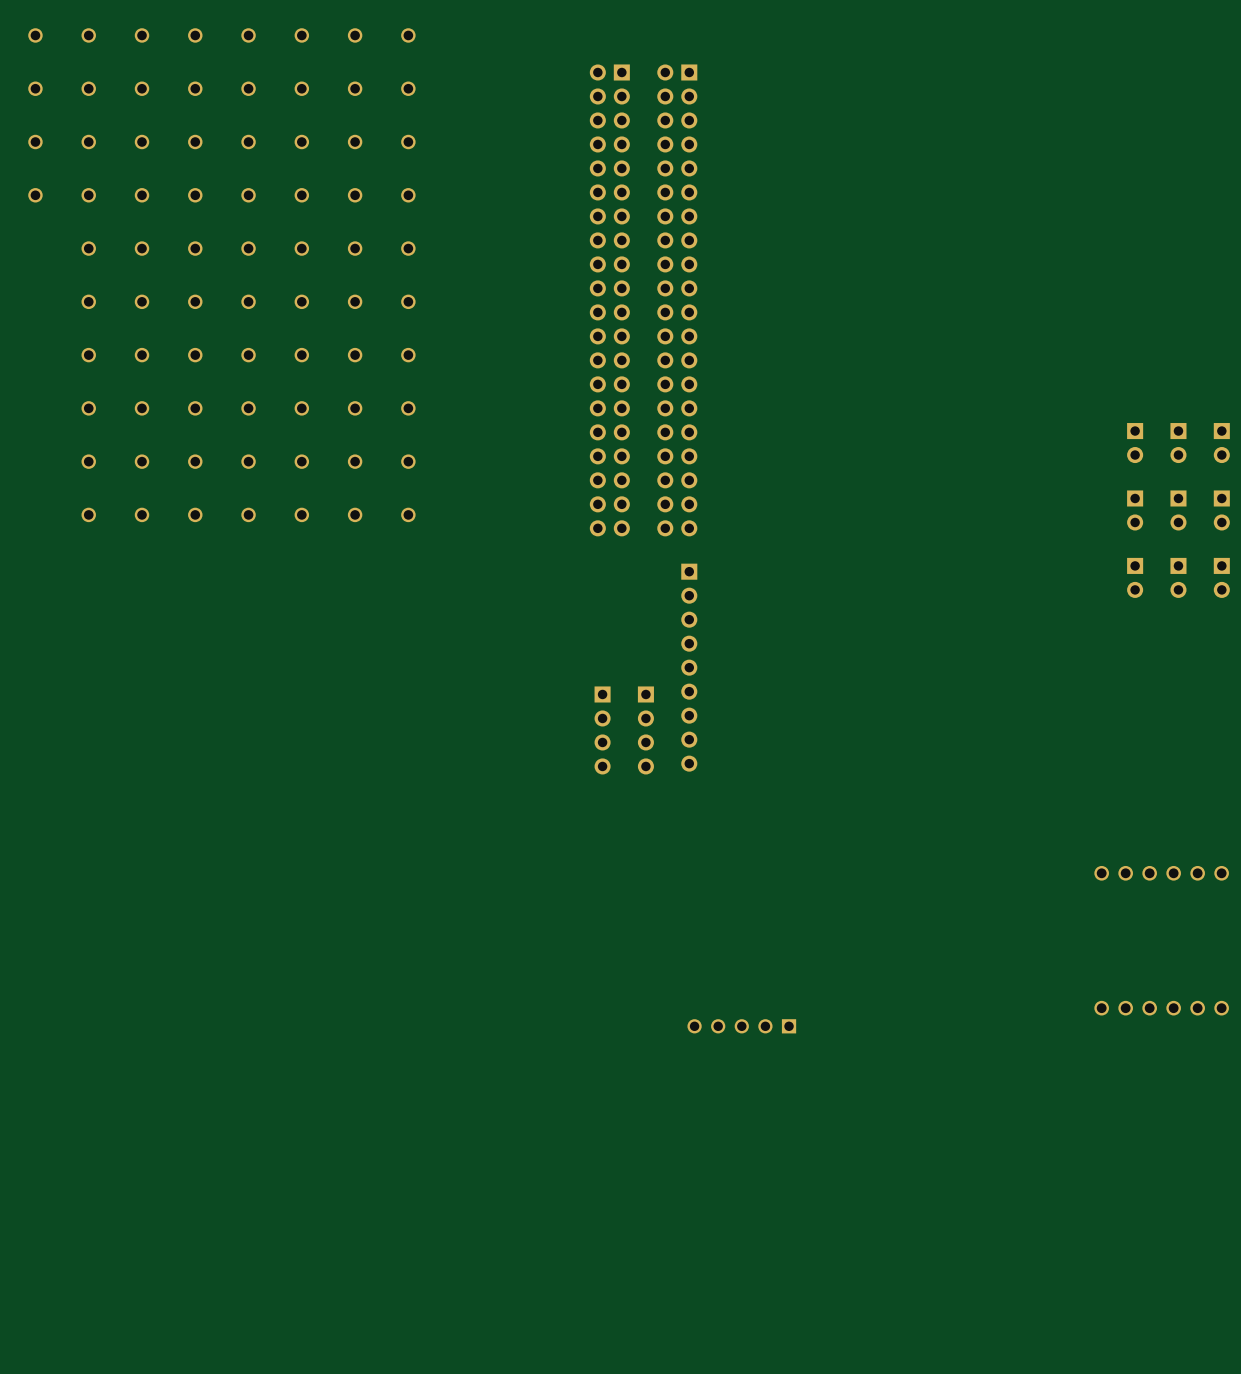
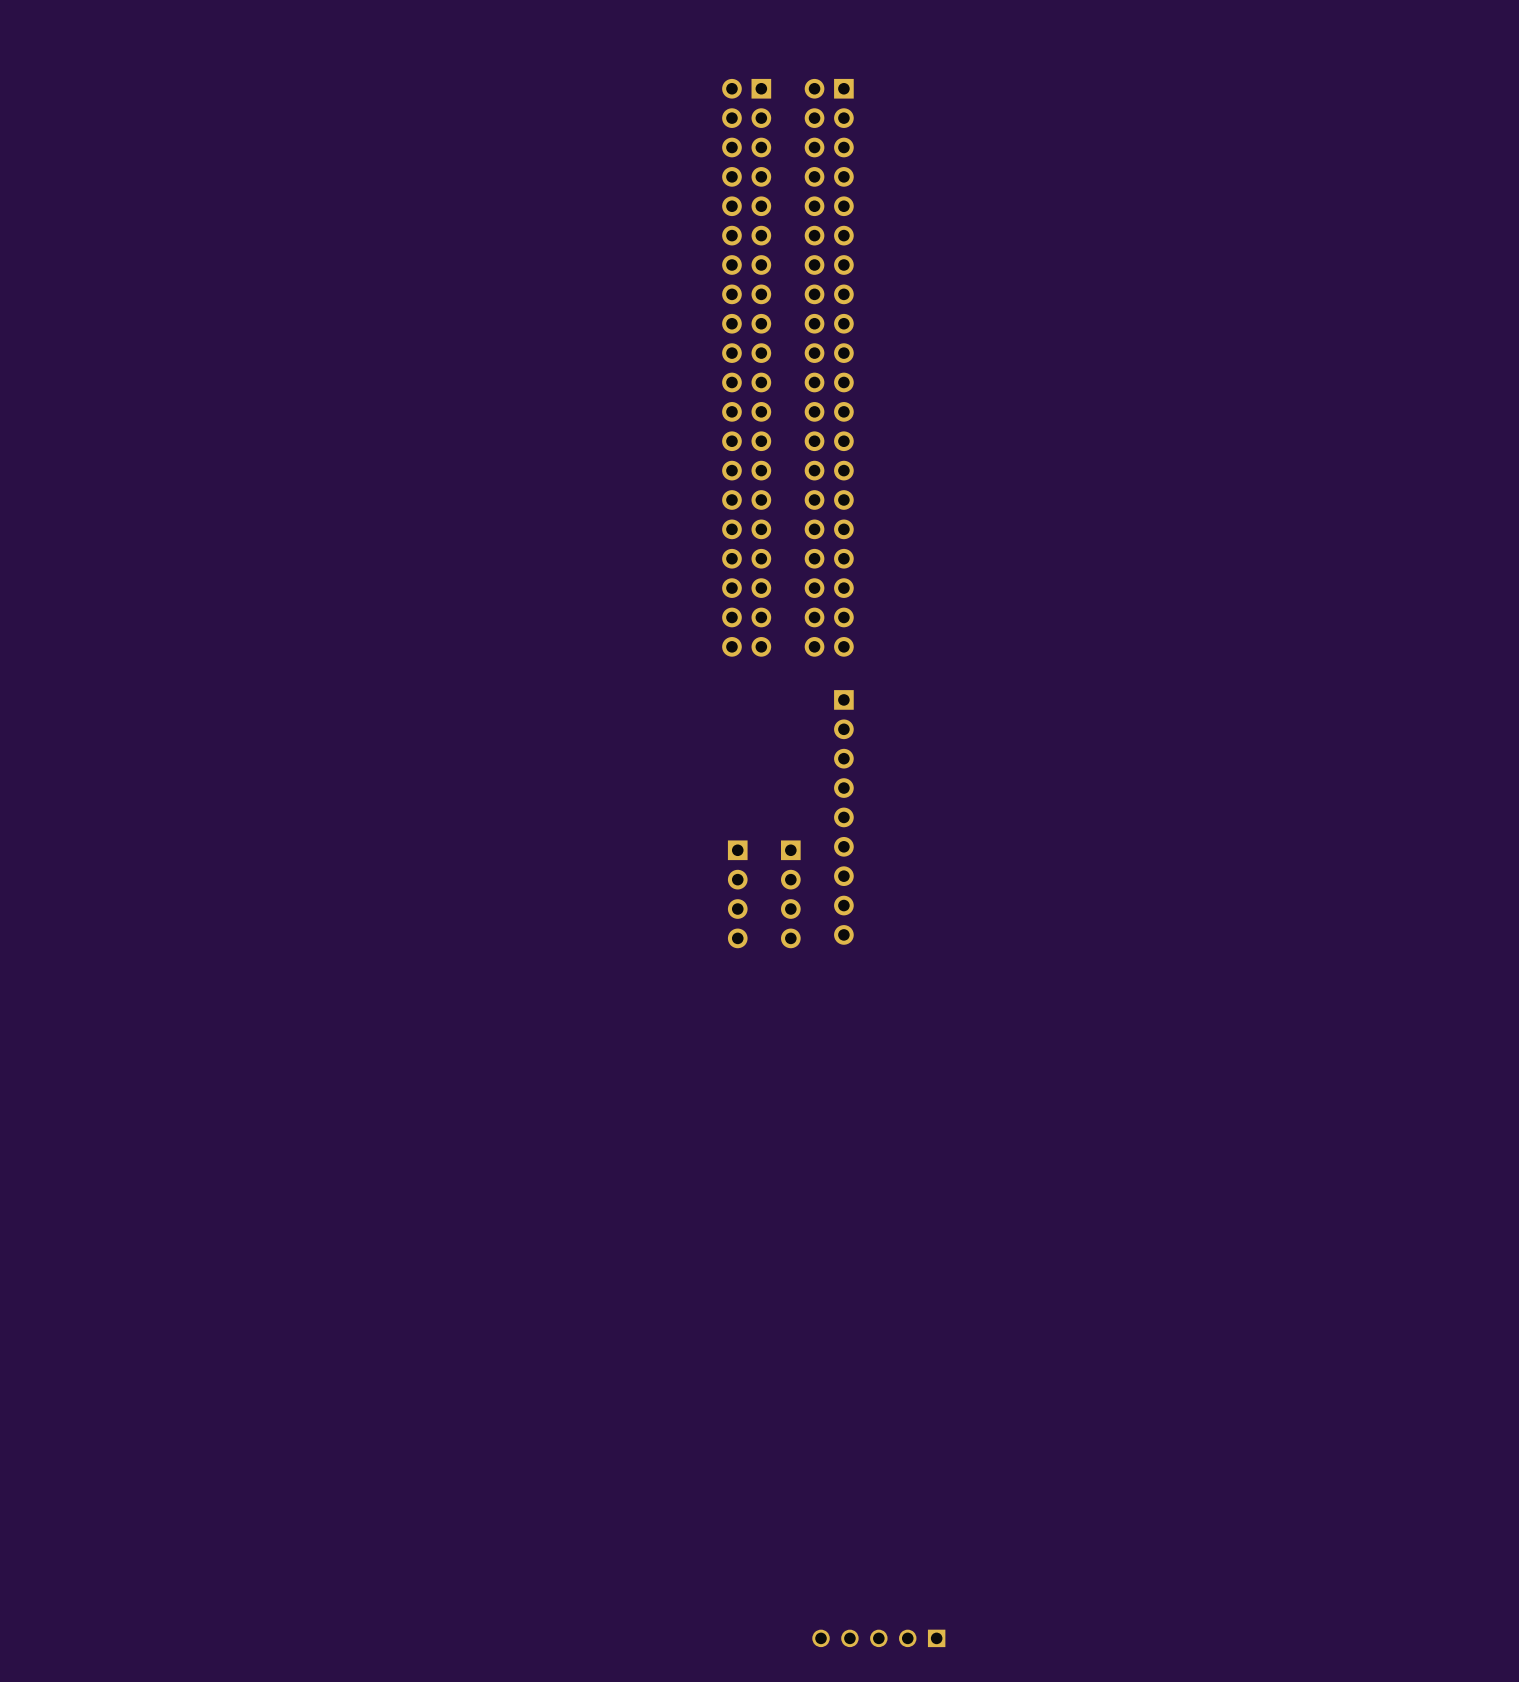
part: (35, 35) -> none
part: (88, 35) -> none
part: (142, 35) -> none
part: (195, 35) -> none
part: (248, 35) -> none
part: (301, 35) -> none
part: (355, 35) -> none
part: (408, 35) -> none
part: (35, 88) -> none
part: (88, 88) -> none
part: (142, 88) -> none
part: (195, 88) -> none
part: (248, 88) -> none
part: (301, 88) -> none
part: (355, 88) -> none
part: (408, 88) -> none
part: (35, 142) -> none
part: (88, 142) -> none
part: (142, 142) -> none
part: (195, 142) -> none
part: (248, 142) -> none
part: (301, 142) -> none
part: (355, 142) -> none
part: (408, 142) -> none
part: (35, 195) -> none
part: (88, 195) -> none
part: (142, 195) -> none
part: (195, 195) -> none
part: (248, 195) -> none
part: (301, 195) -> none
part: (355, 195) -> none
part: (408, 195) -> none
part: (88, 248) -> none
part: (142, 248) -> none
part: (195, 248) -> none
part: (248, 248) -> none
part: (301, 248) -> none
part: (355, 248) -> none
part: (408, 248) -> none
part: (88, 301) -> none
part: (142, 301) -> none
part: (195, 301) -> none
part: (248, 301) -> none
part: (301, 301) -> none
part: (355, 301) -> none
part: (408, 301) -> none
part: (88, 355) -> none
part: (142, 355) -> none
part: (195, 355) -> none
part: (248, 355) -> none
part: (301, 355) -> none
part: (355, 355) -> none
part: (408, 355) -> none
part: (88, 408) -> none
part: (142, 408) -> none
part: (195, 408) -> none
part: (248, 408) -> none
part: (301, 408) -> none
part: (355, 408) -> none
part: (408, 408) -> none
part: (1135, 443) -> none
part: (1178, 443) -> none
part: (1221, 443) -> none
part: (88, 461) -> none
part: (142, 461) -> none
part: (195, 461) -> none
part: (248, 461) -> none
part: (301, 461) -> none
part: (355, 461) -> none
part: (408, 461) -> none
part: (1135, 510) -> none
part: (1178, 510) -> none
part: (1221, 510) -> none
part: (88, 514) -> none
part: (142, 514) -> none
part: (195, 514) -> none
part: (248, 514) -> none
part: (301, 514) -> none
part: (355, 514) -> none
part: (408, 514) -> none
part: (1135, 577) -> none
part: (1178, 577) -> none
part: (1221, 577) -> none
part: (1161, 873) -> none
part: (1161, 1008) -> none
part: (741, 1026) -> none
part: none -> (878, 1638)

